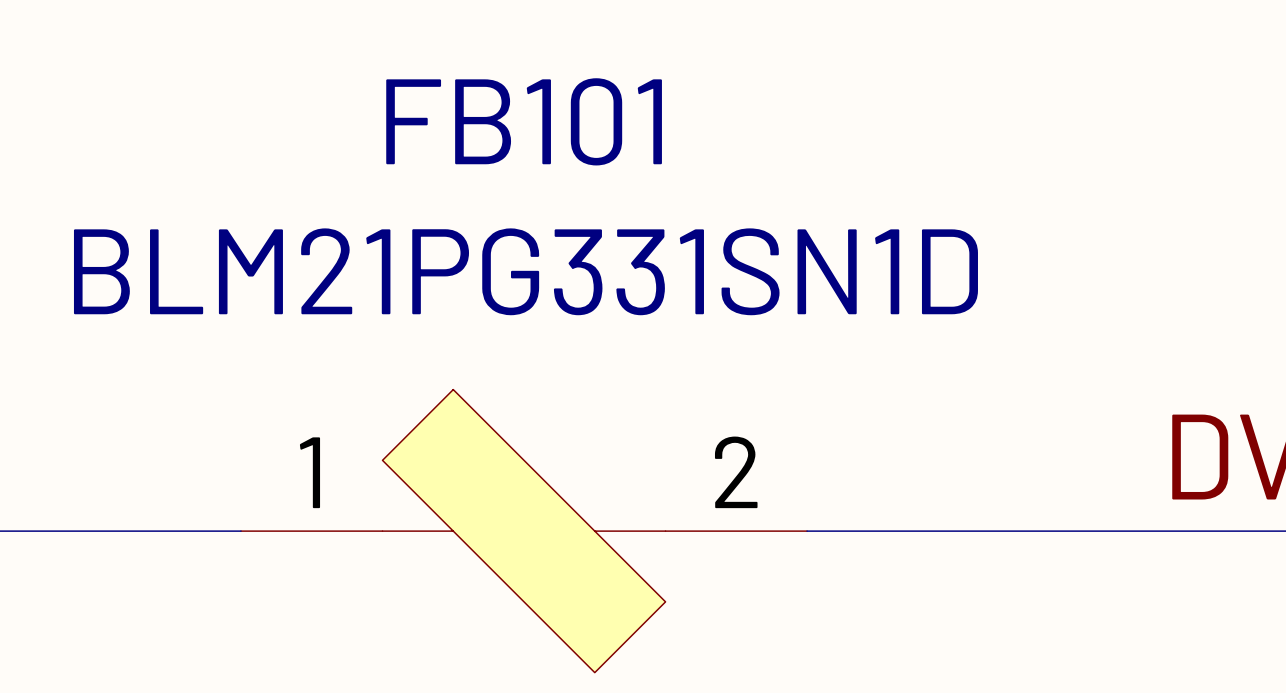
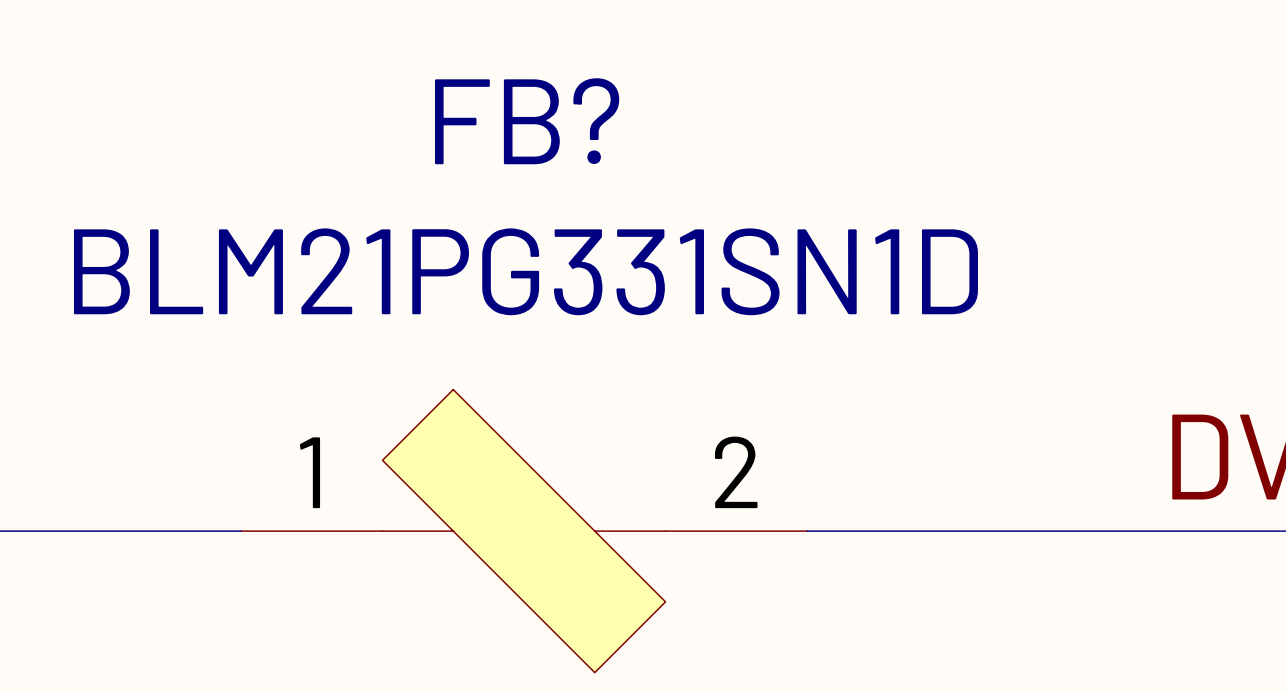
FB101 name: FB101 (524, 121) -> FB? (527, 121)

